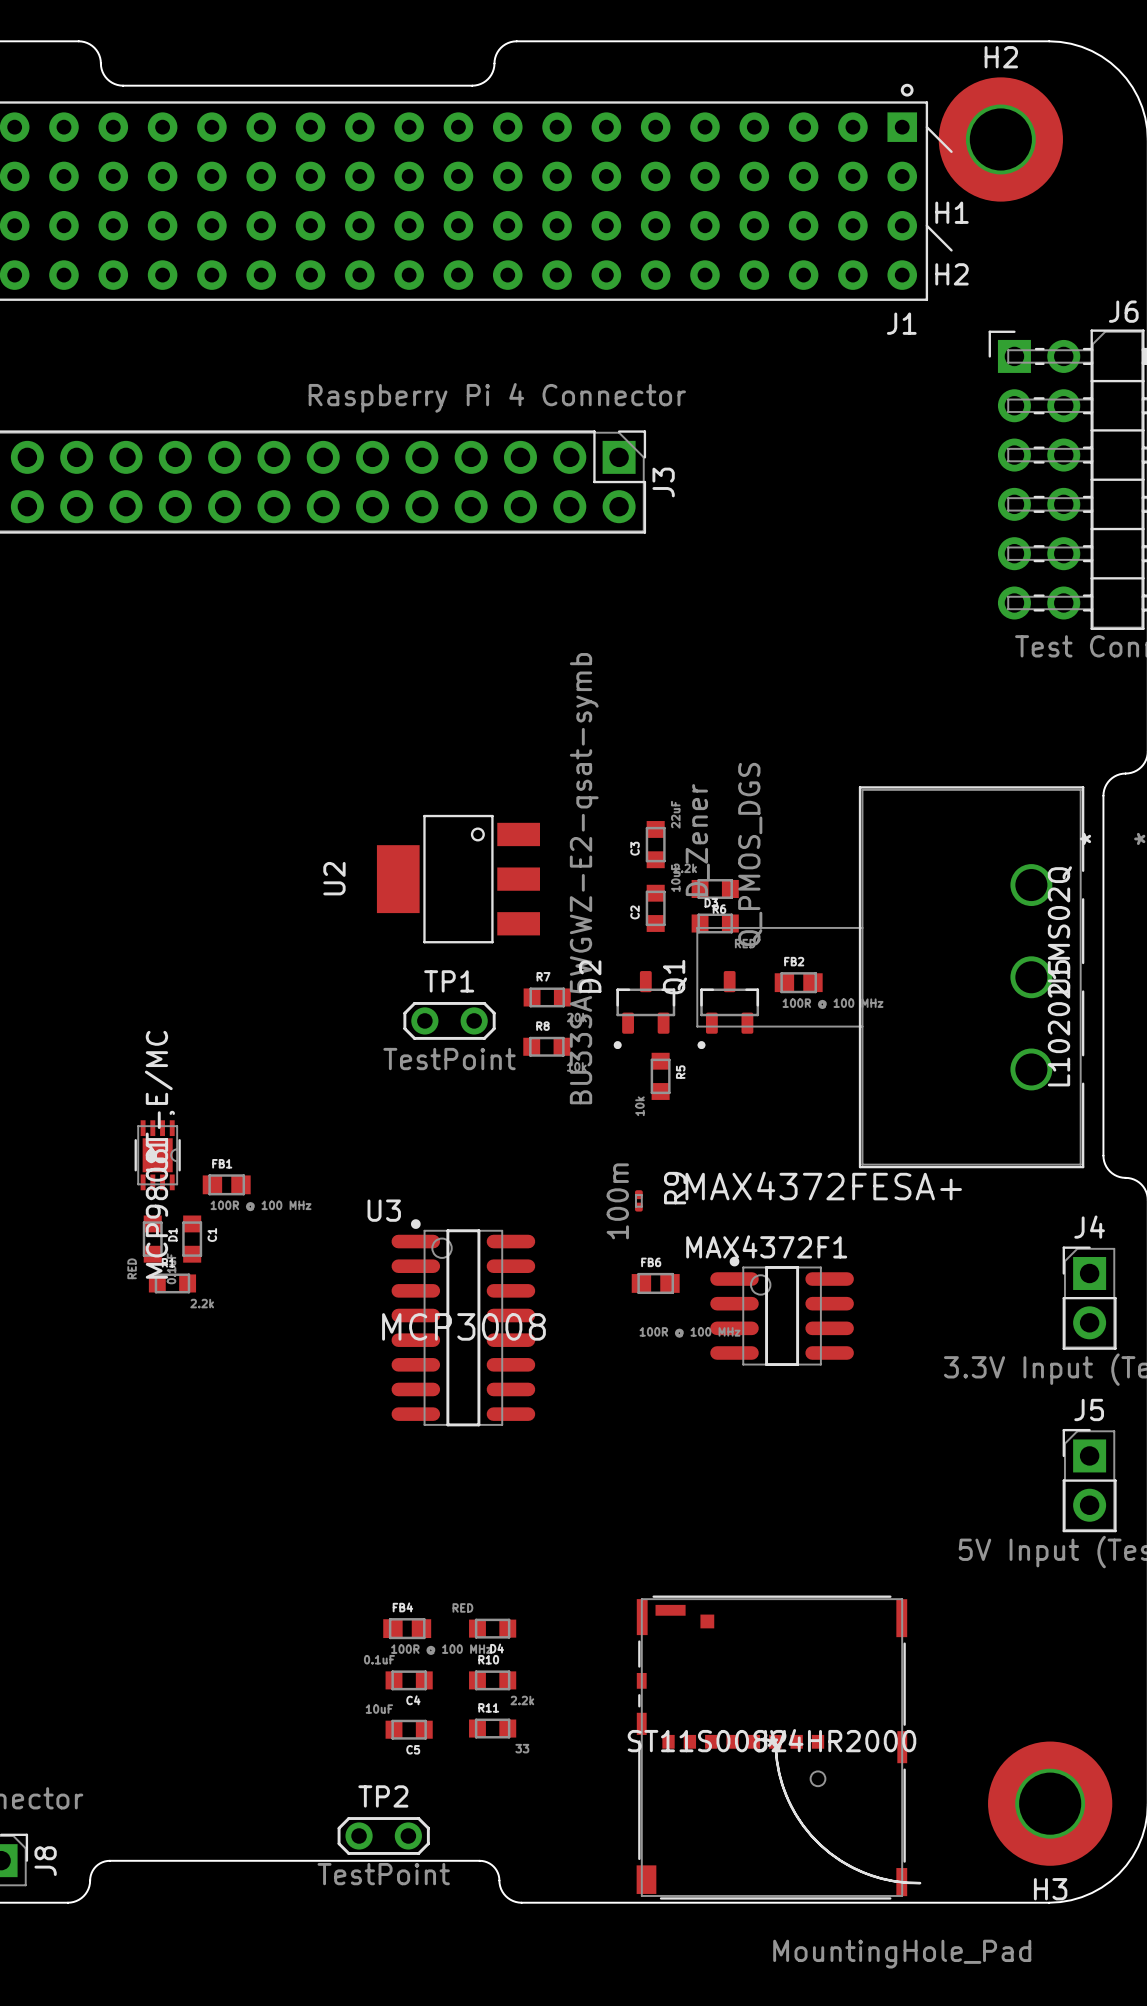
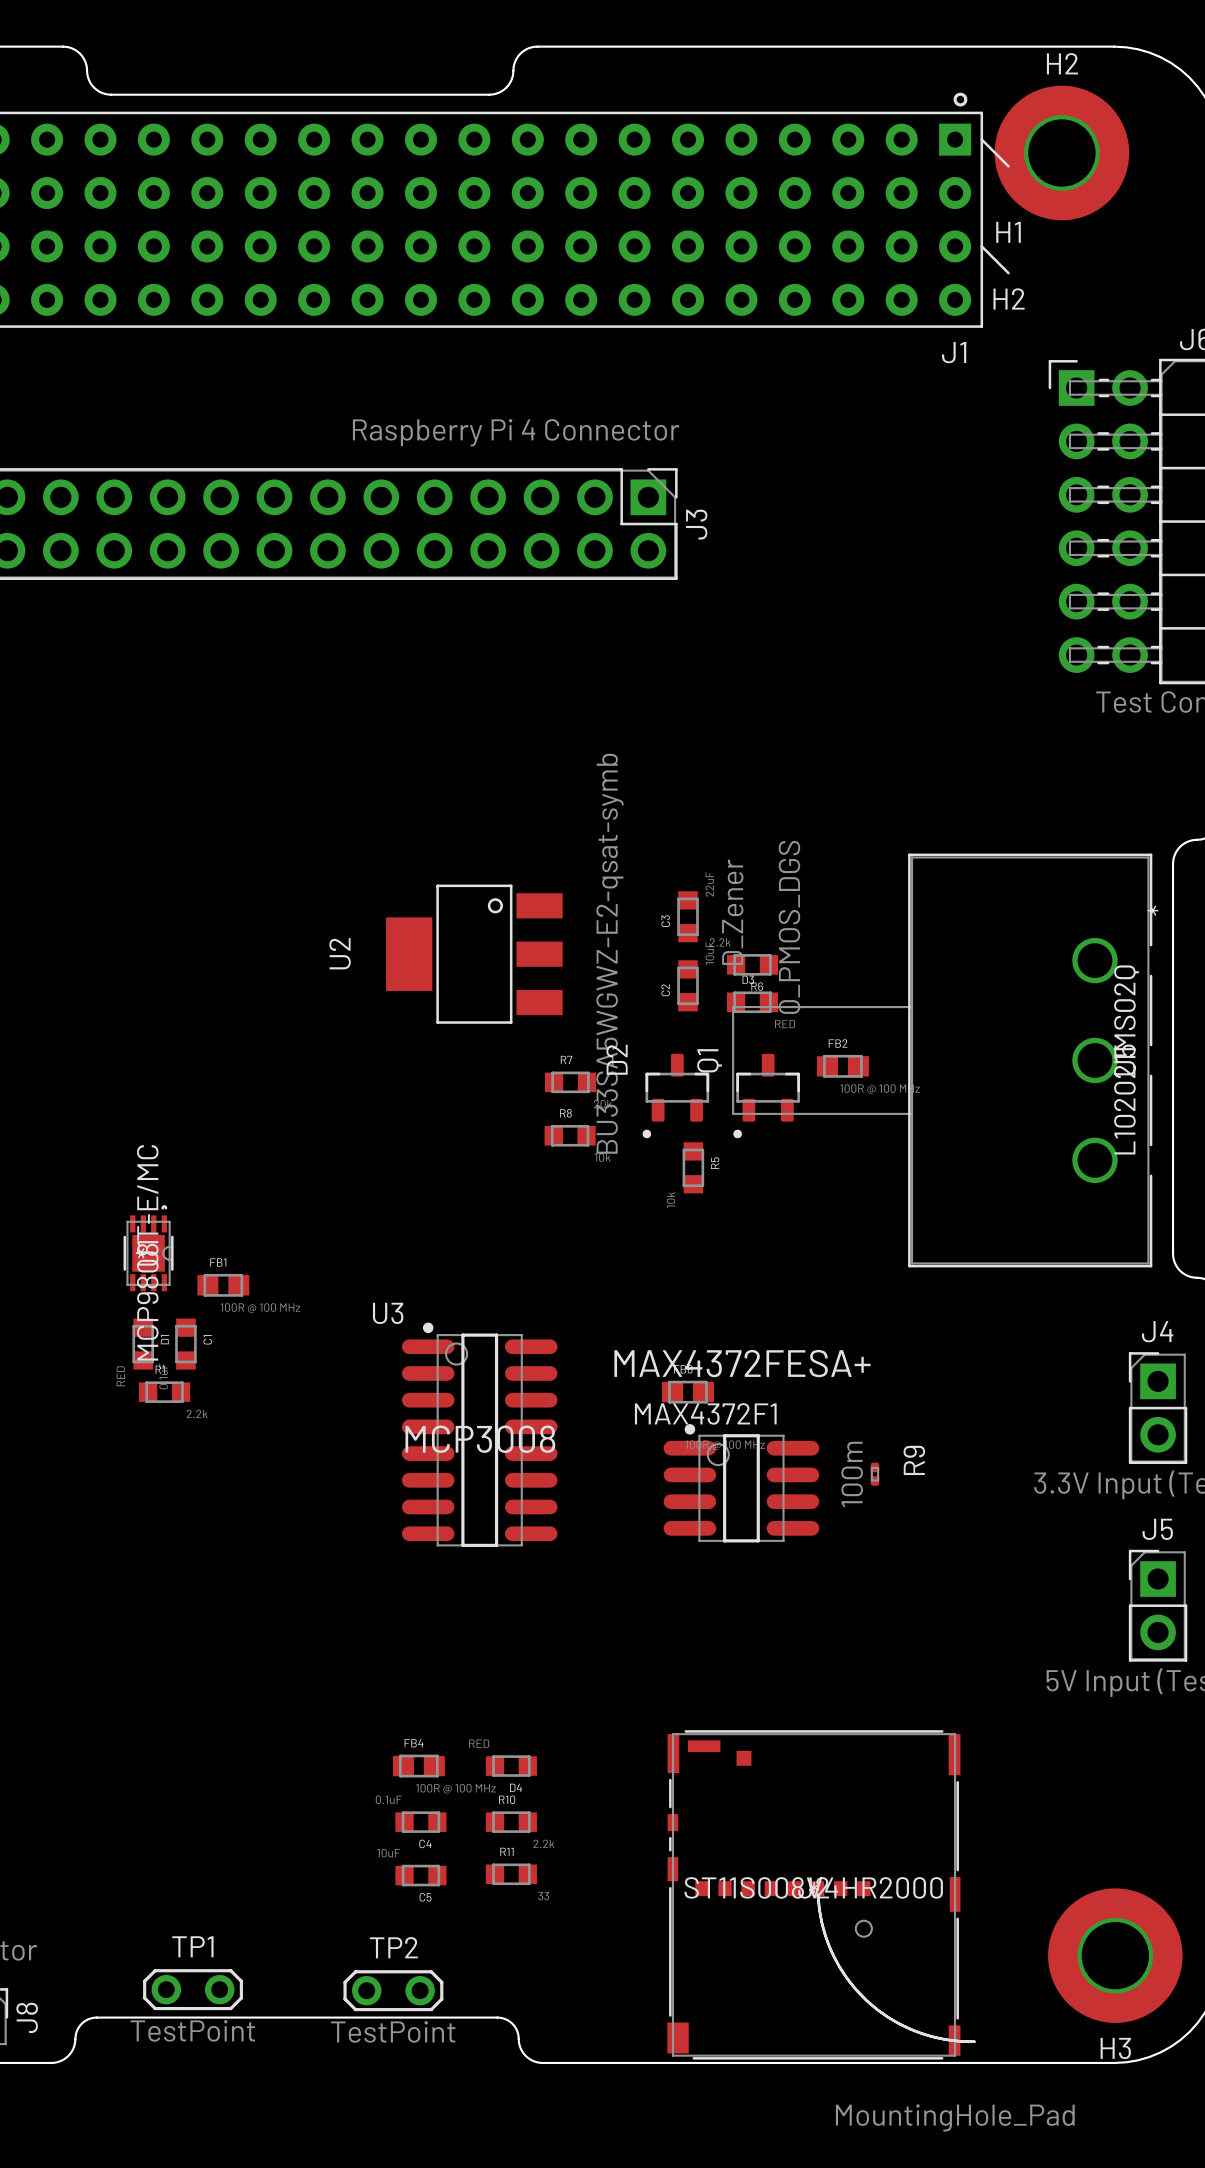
TP1 position: (449, 1020) -> (193, 1989)
MAX4372F1 value position: MAX4372FESA+ (823, 1185) -> MAX4372FESA+ (742, 1363)
R9 position: (638, 1200) -> (874, 1474)
MAX4372F1 position: (782, 1311) -> (741, 1483)

